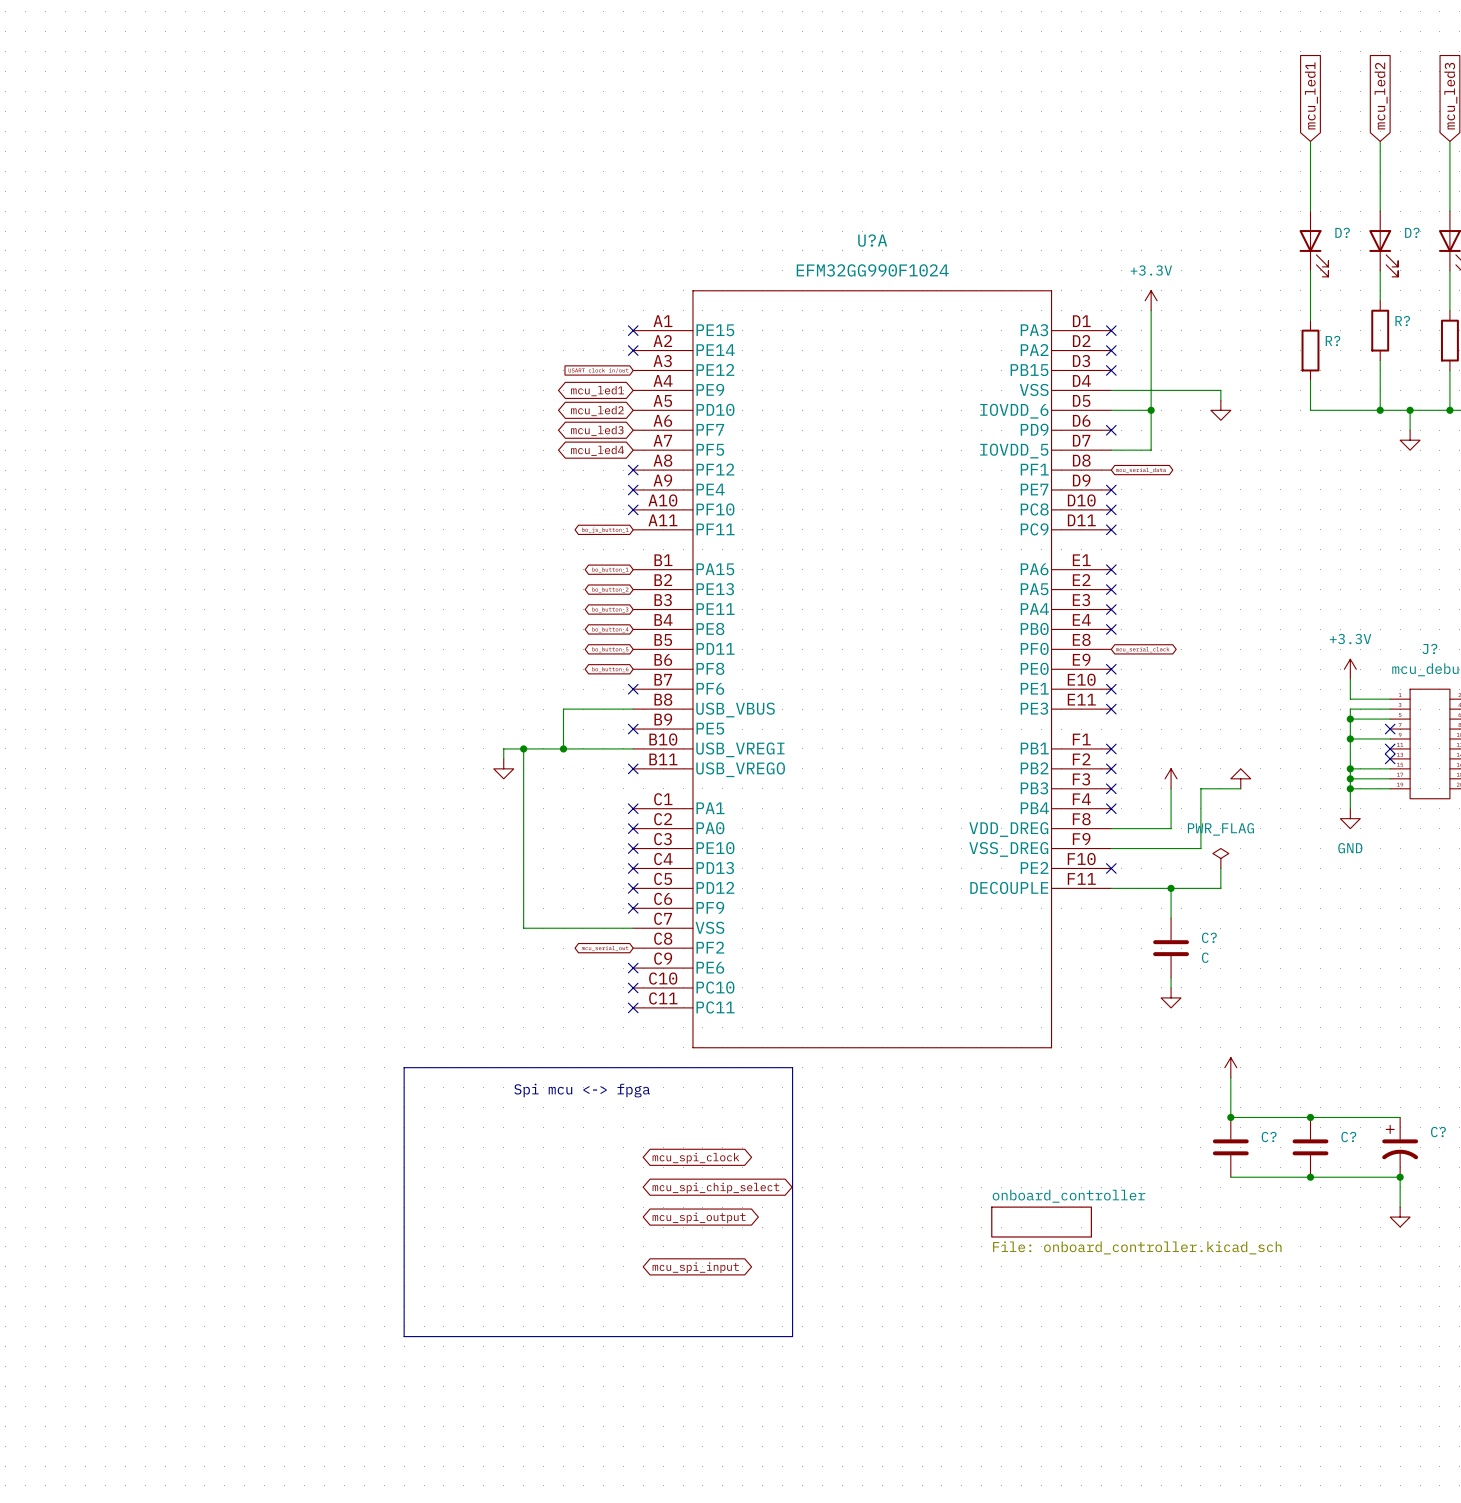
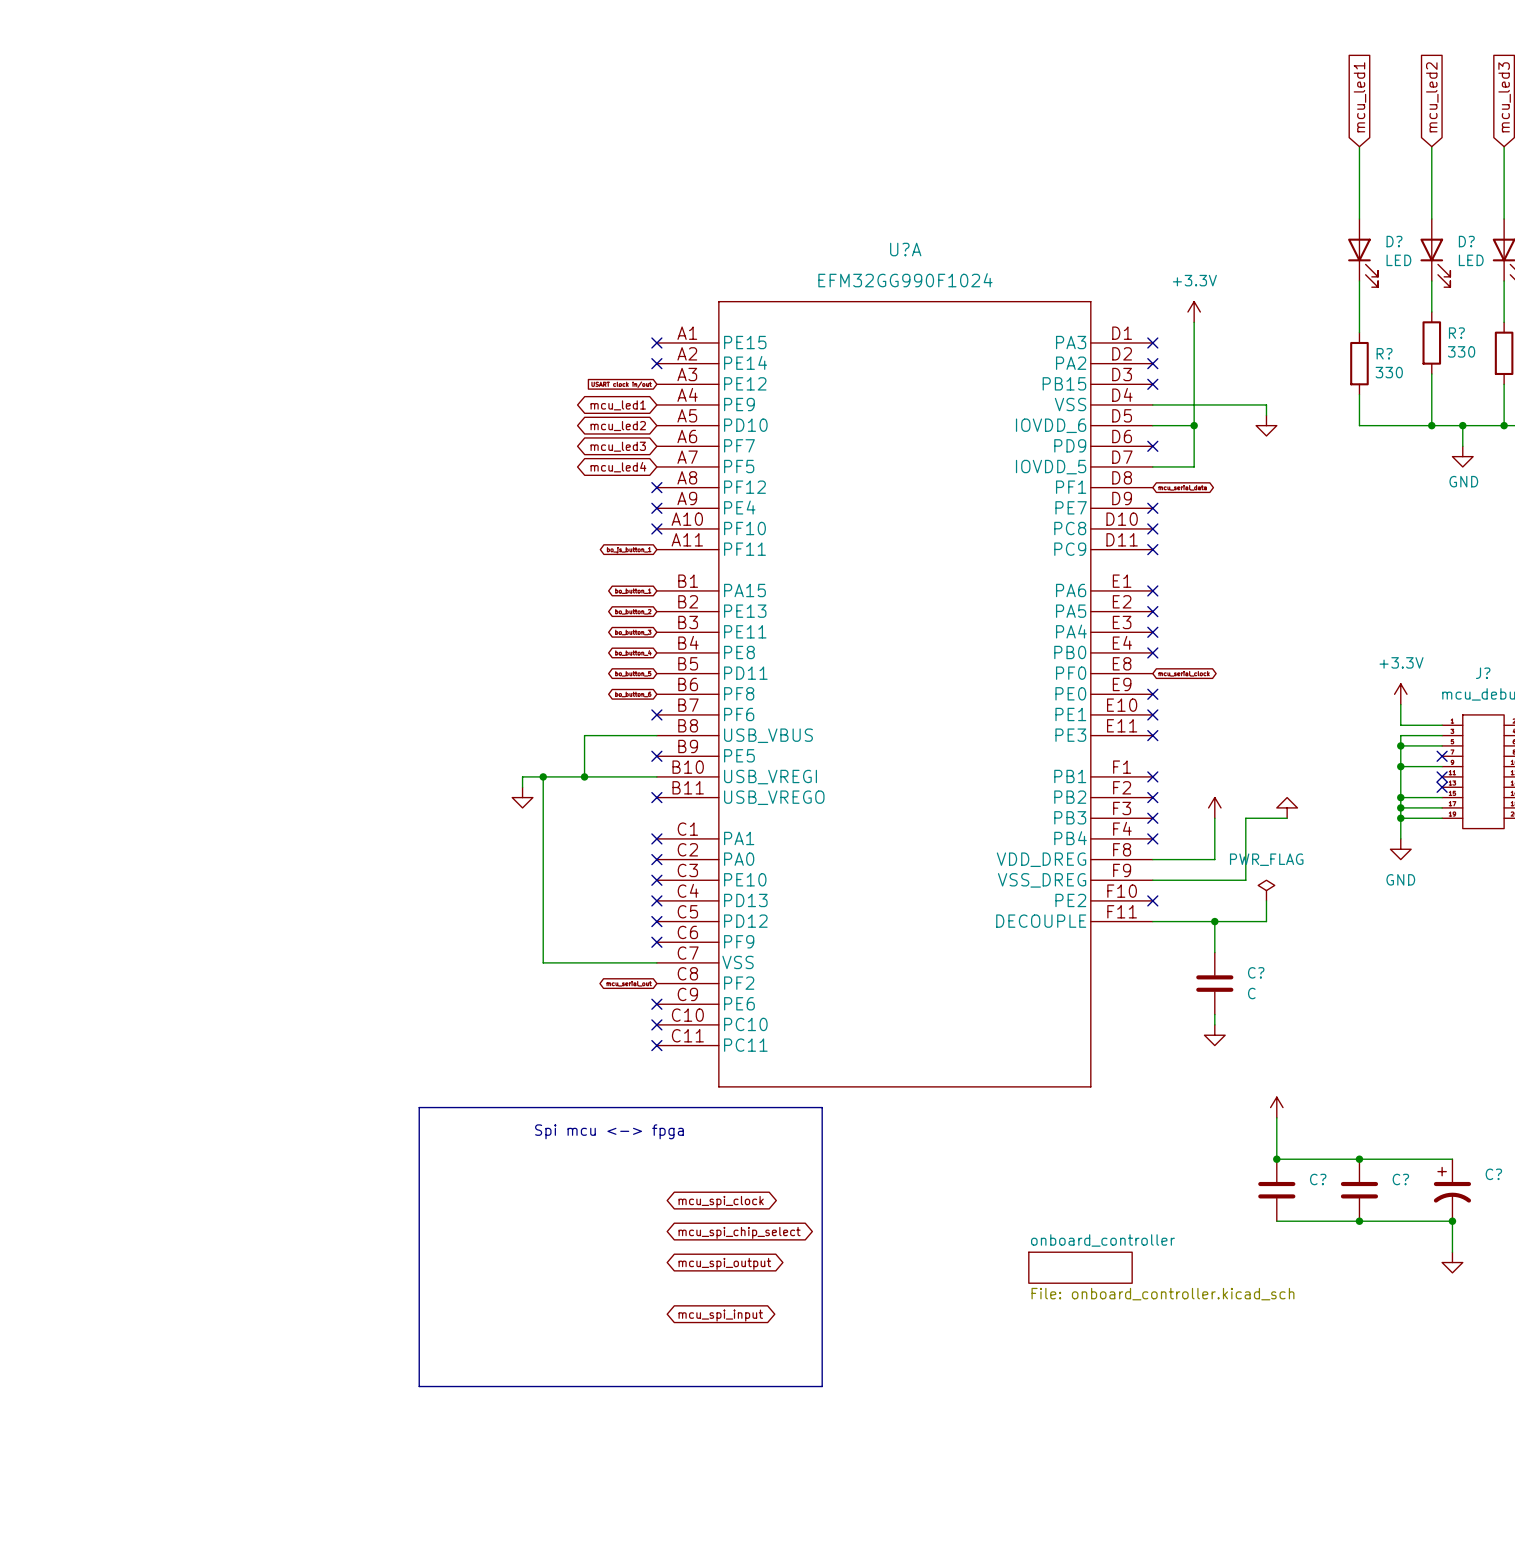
D? value: none -> LED (1398, 260)
D? value: none -> LED (1471, 260)
R? value: none -> 330 (1461, 351)
R? value: none -> 330 (1389, 372)
power symbol text: none -> GND (1463, 481)

